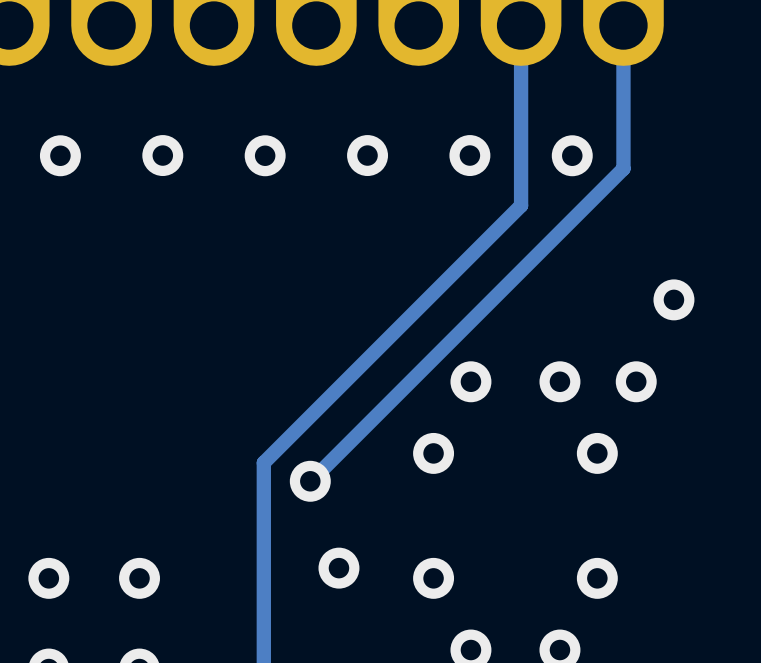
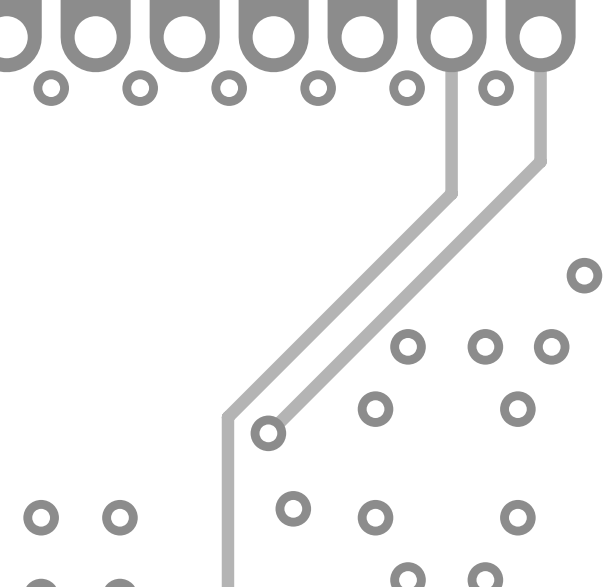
via: none -> (51, 88)
via: none -> (140, 88)
via: none -> (229, 88)
via: none -> (318, 88)
via: none -> (407, 88)
via: none -> (496, 88)
via: (60, 155) -> none
via: (162, 155) -> none
via: (265, 155) -> none
via: (367, 155) -> none
via: (469, 155) -> none
via: (572, 155) -> none

